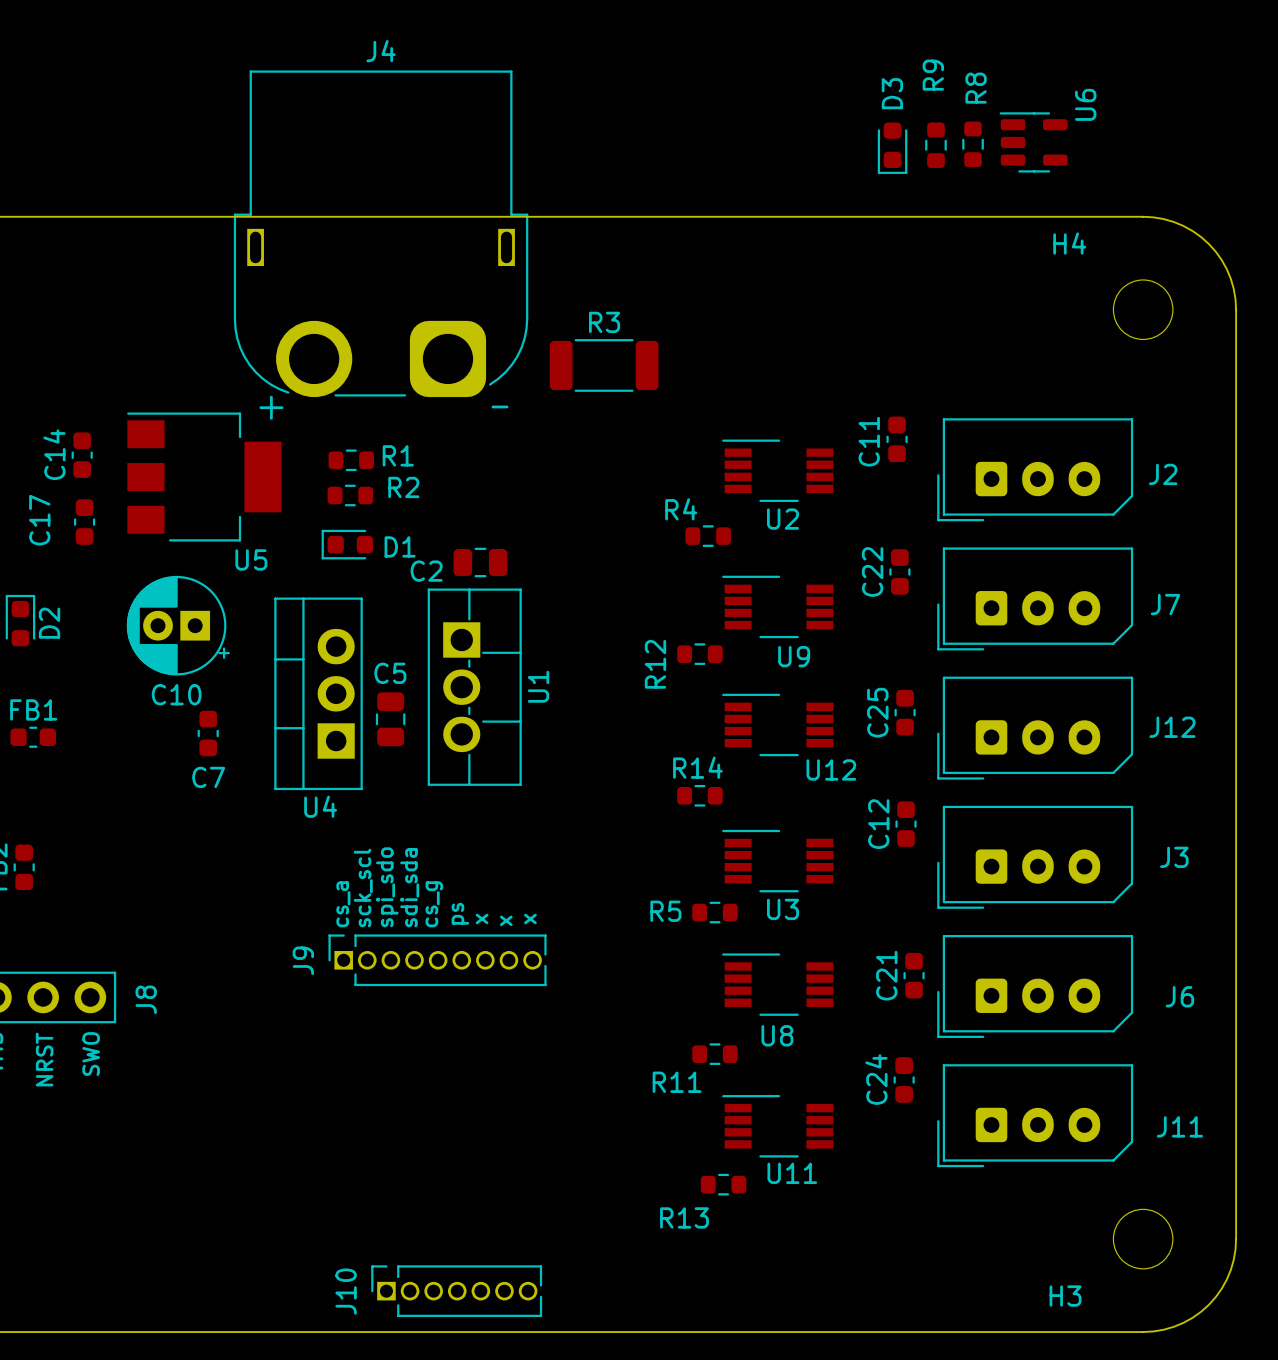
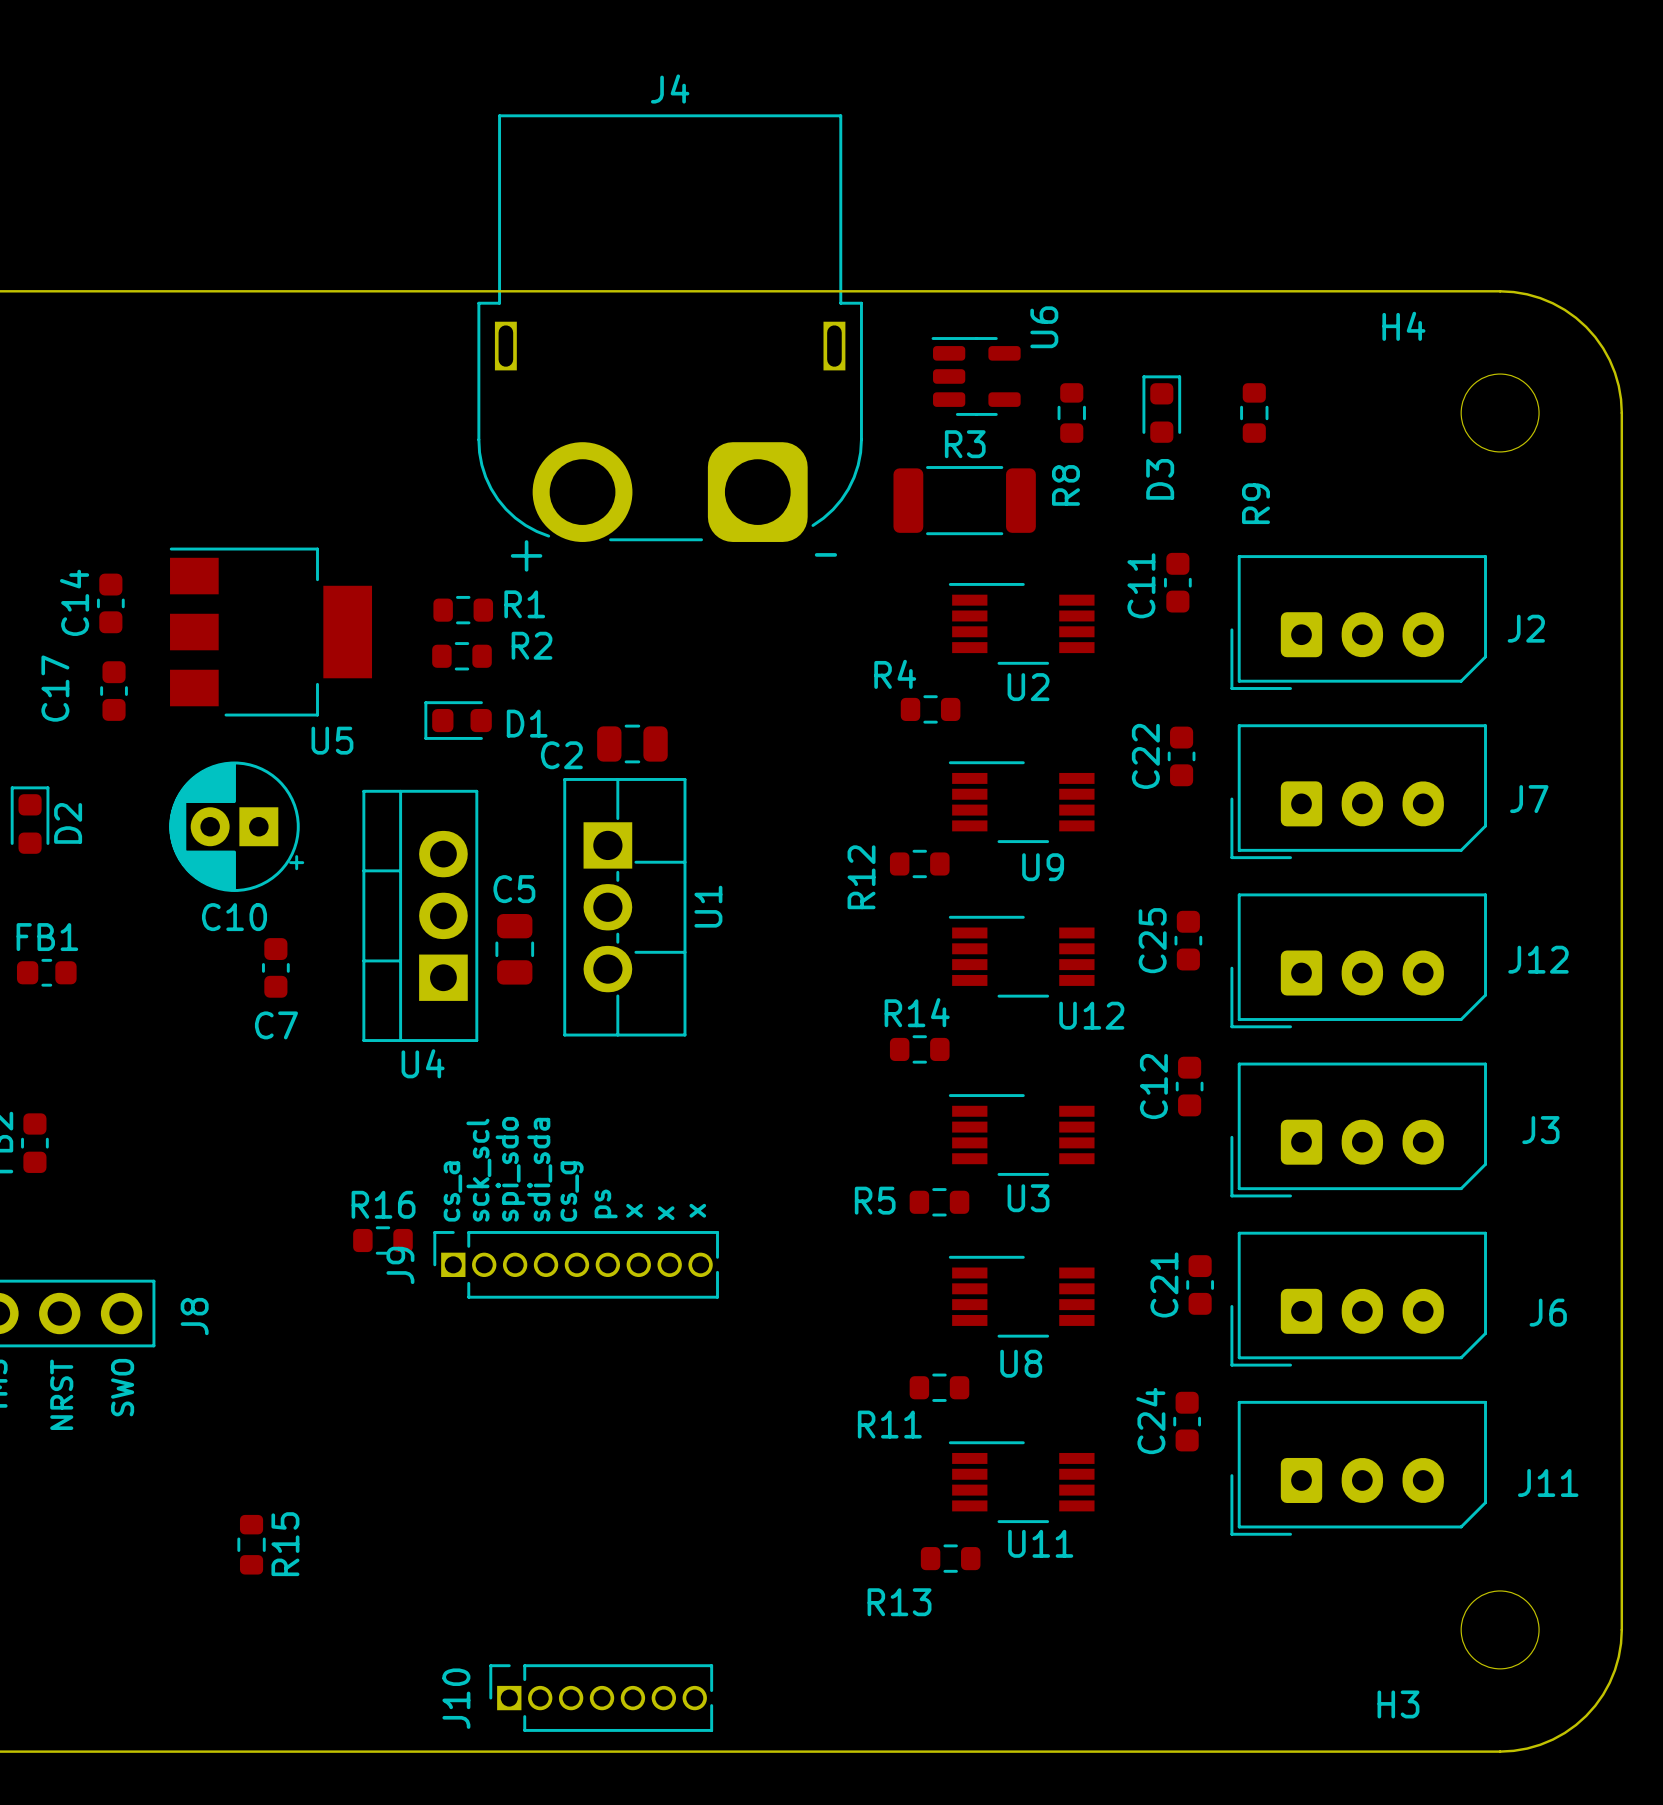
R9 name position: R9 (933, 75) -> R9 (1255, 503)
R8 name position: R8 (976, 88) -> R8 (1065, 485)
U6 position: (1033, 142) -> (976, 376)
R8 position: (973, 144) -> (1071, 412)
R9 position: (935, 145) -> (1254, 412)
D3 rotation: 0° (892, 148) -> 180° (1161, 409)
D3 position: (892, 148) -> (1161, 409)
J4 position: (381, 233) -> (670, 328)
R3 position: (604, 365) -> (964, 500)
R16: none -> (382, 1240)
R15: none -> (251, 1544)

